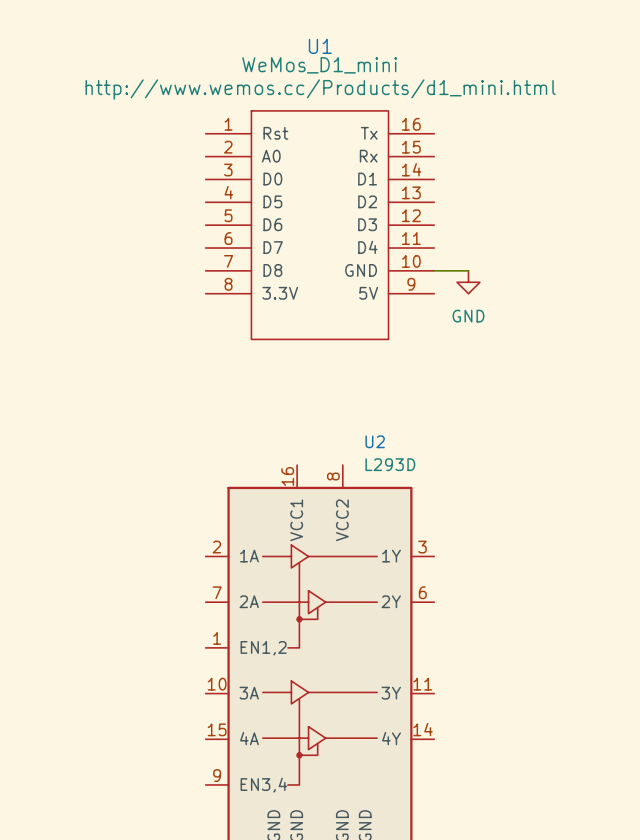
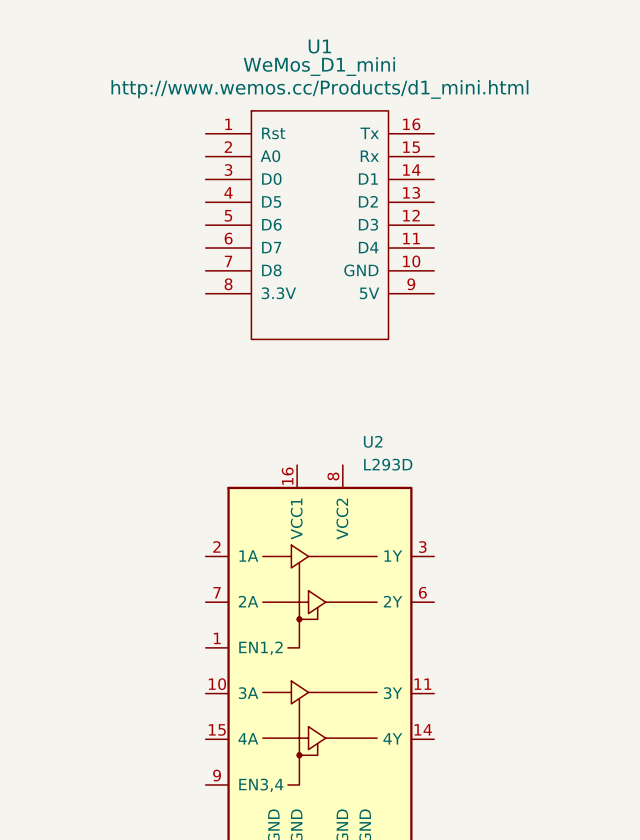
wire: (434, 270) (468, 270) -> none
power symbol: GND (468, 282) -> none

